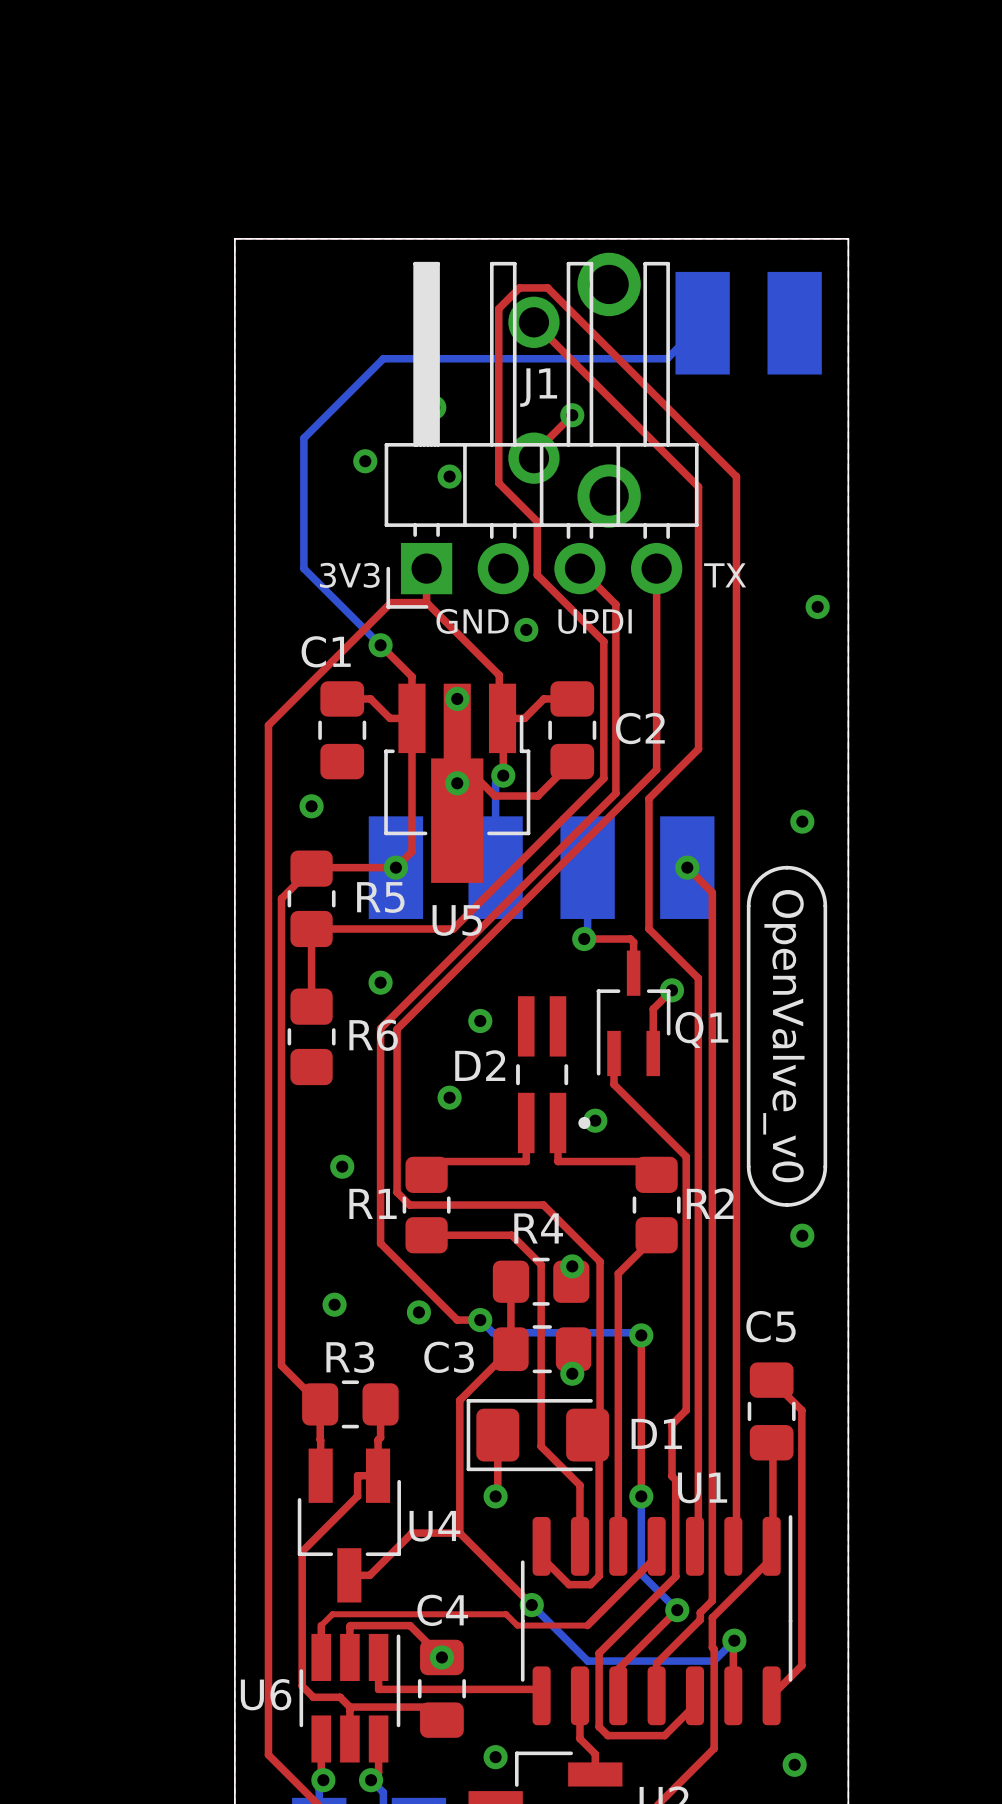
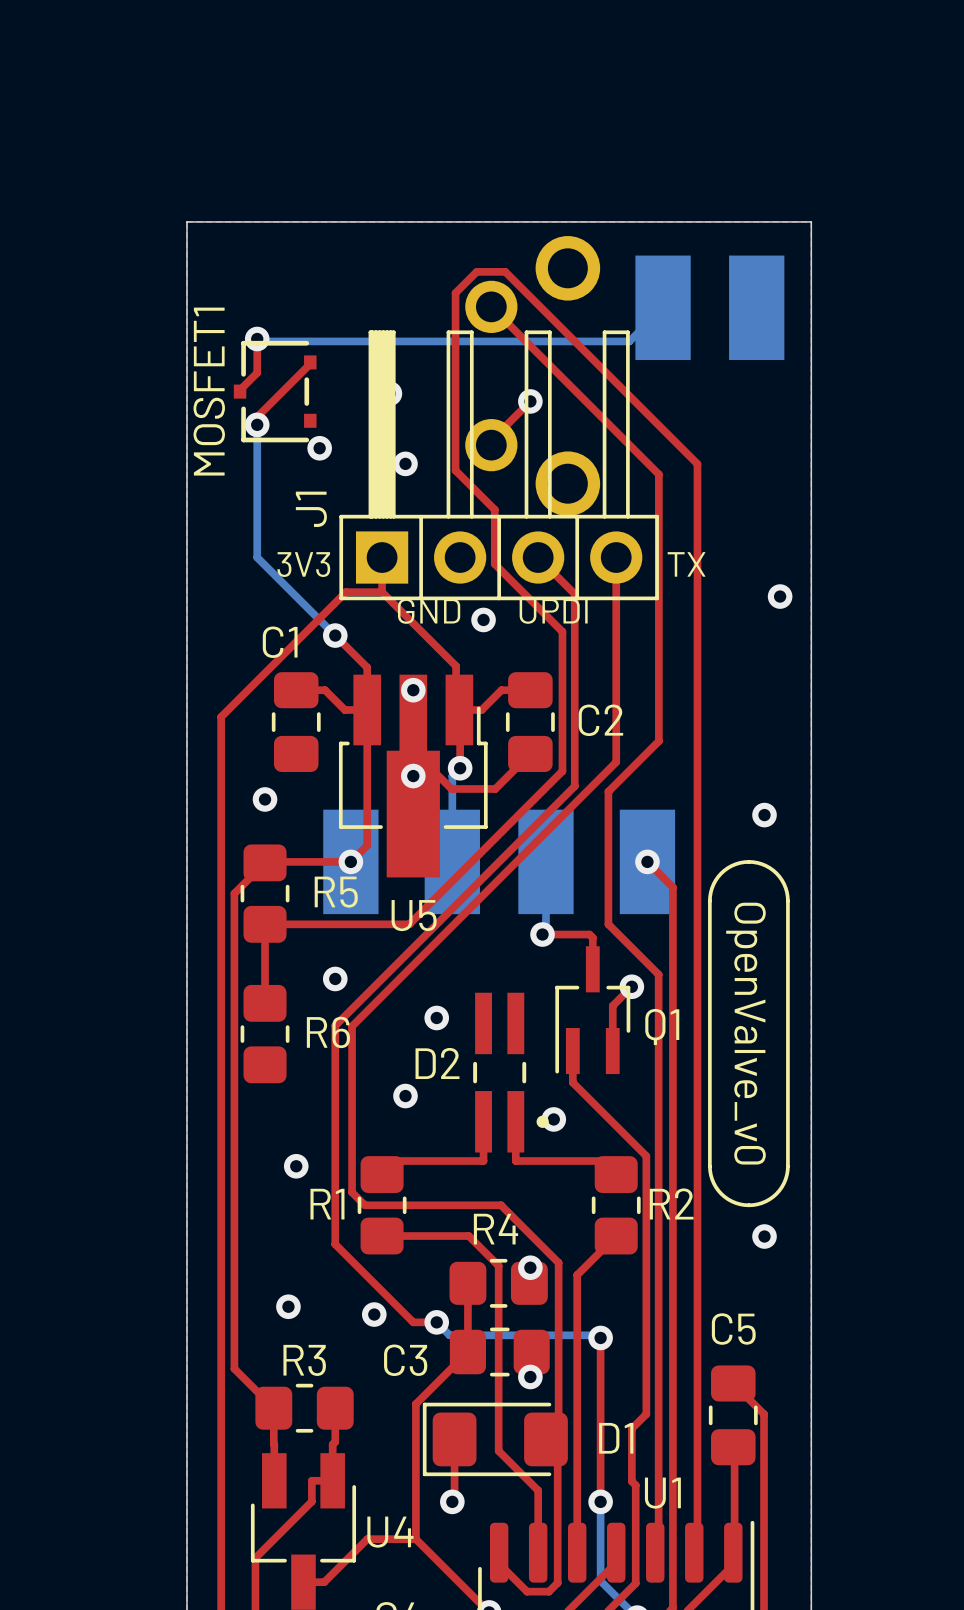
J1 footprint: [384, 261, 699, 609] -> [339, 330, 659, 601]
top track: none -> (257, 339) (257, 372) (238, 391)
via: none -> (257, 339)
bottom track: (669, 356) (667, 358) (383, 358) (303, 438) -> (629, 341) (259, 341) (257, 339)
top track: none -> (311, 362) (257, 417) (257, 424)
J1 name position: J1 (538, 387) -> J1 (311, 509)
MOSFET1: none -> (275, 391)
via: none -> (257, 424)

